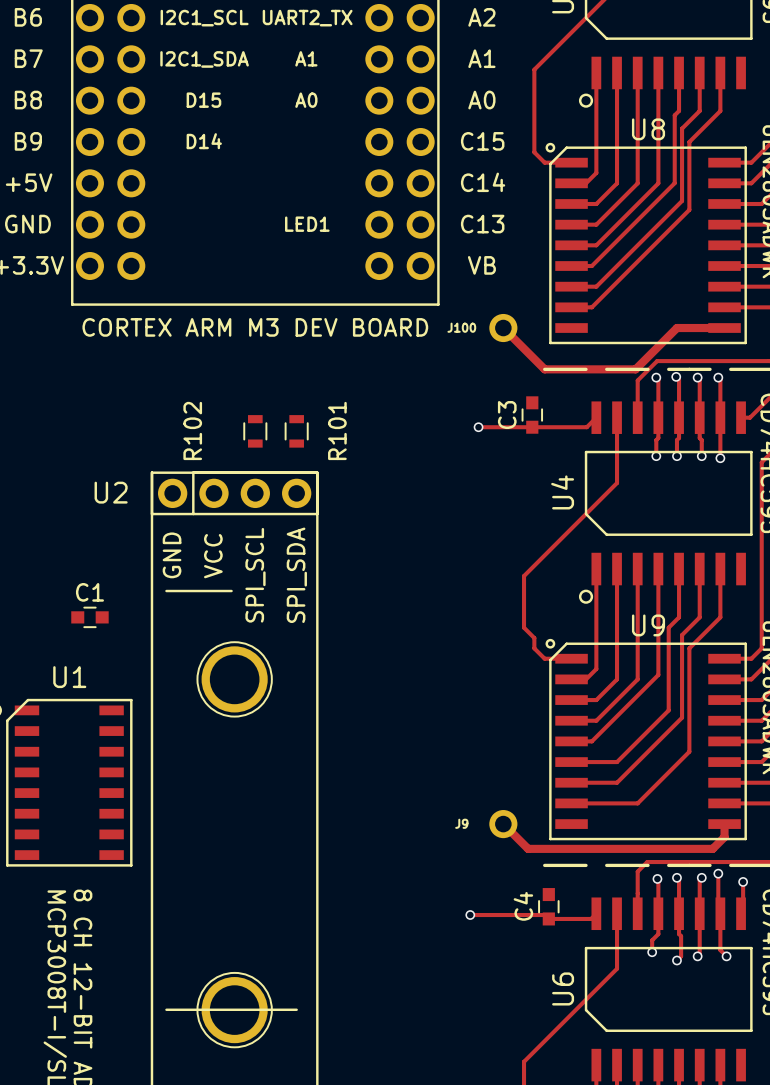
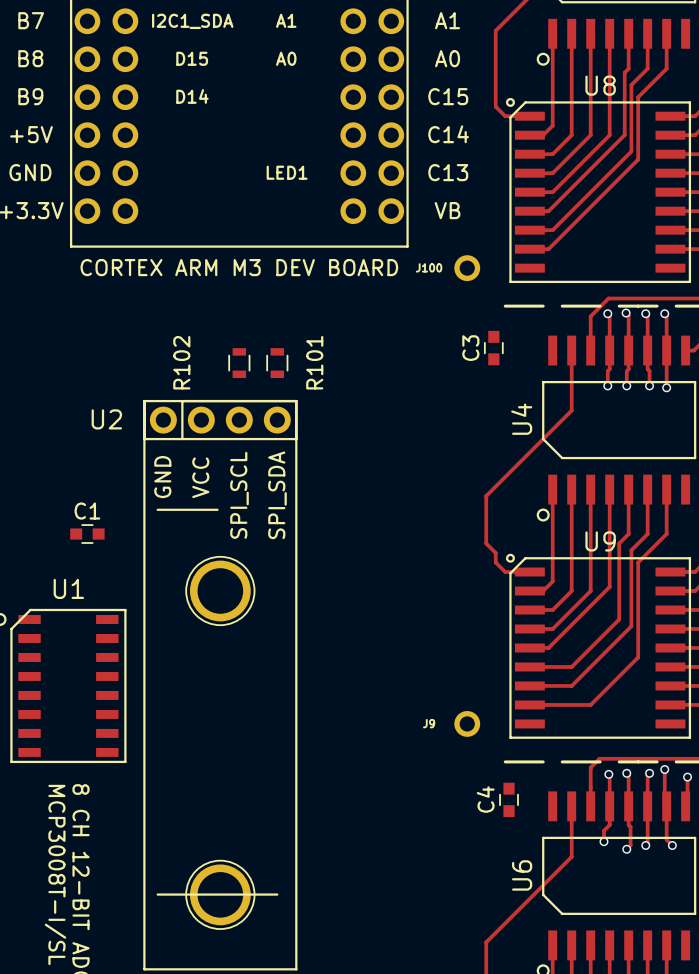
track: (503, 328) (544, 369) (635, 369) (676, 328) (724, 328) -> none
track: (596, 417) (586, 427) (478, 427) -> none
via: (478, 427) -> none
track: (503, 824) (528, 848) (712, 848) (724, 837) (724, 824) -> none
track: (596, 913) (591, 918) (548, 918) (544, 915) (470, 915) -> none
via: (470, 915) -> none

